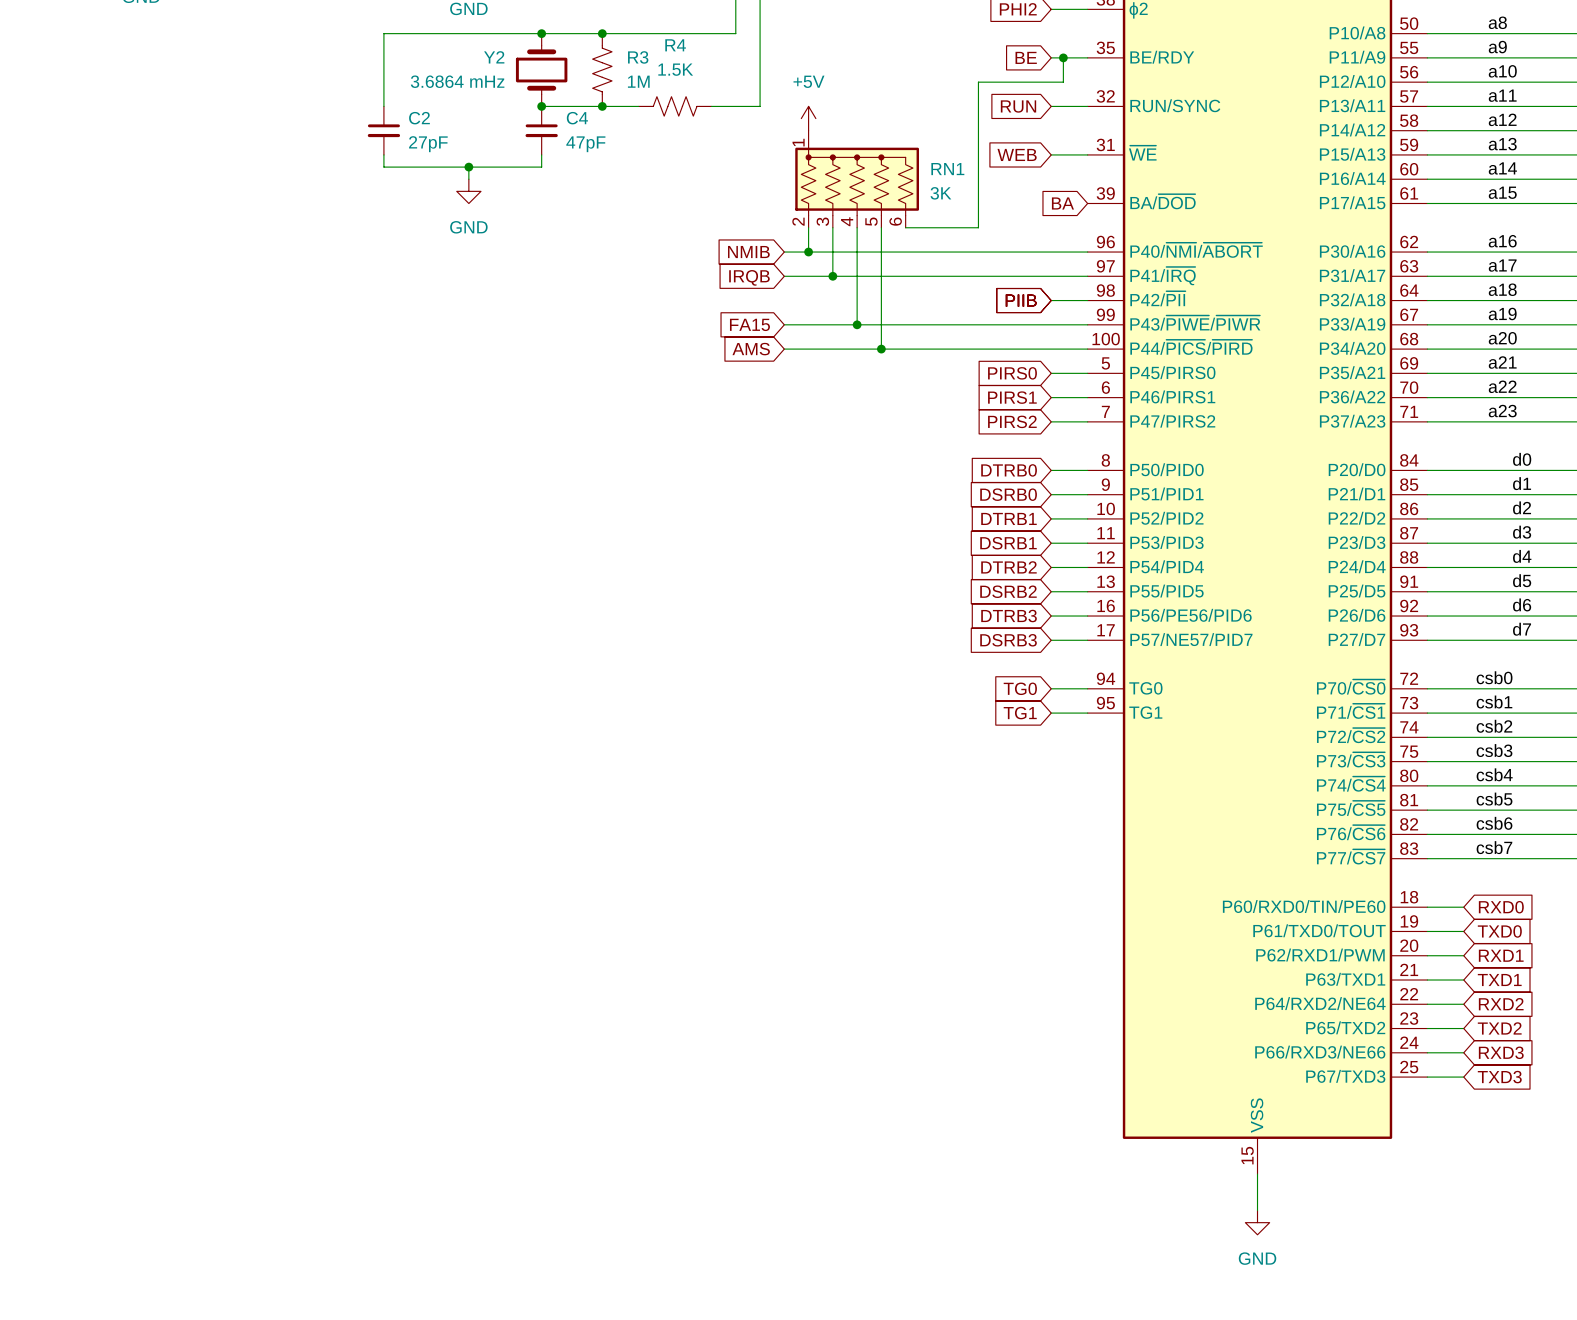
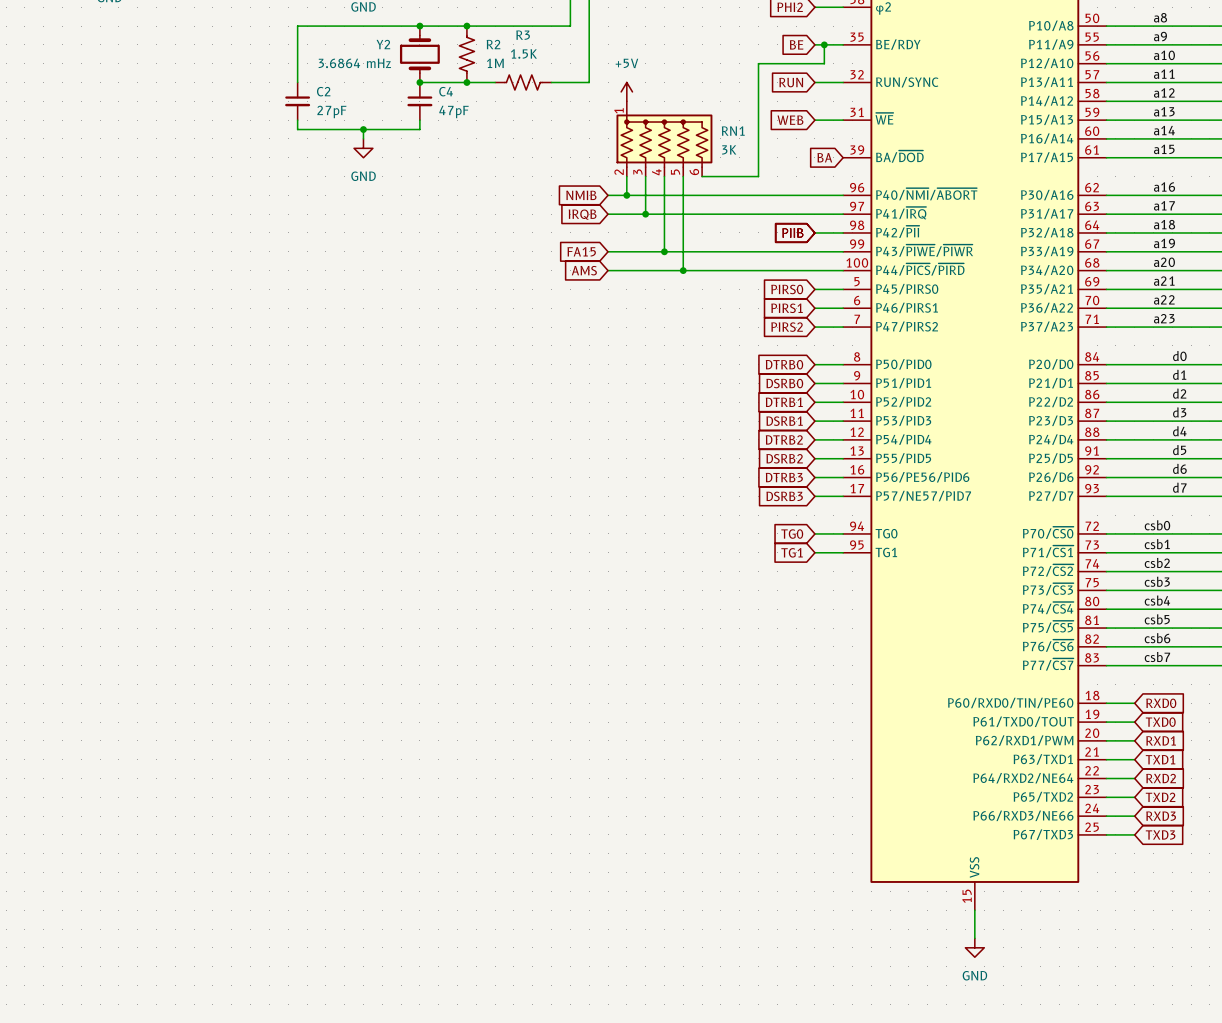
R4 name: R4 (675, 45) -> R3 (523, 35)
R3 name: R3 (638, 57) -> R2 (493, 44)

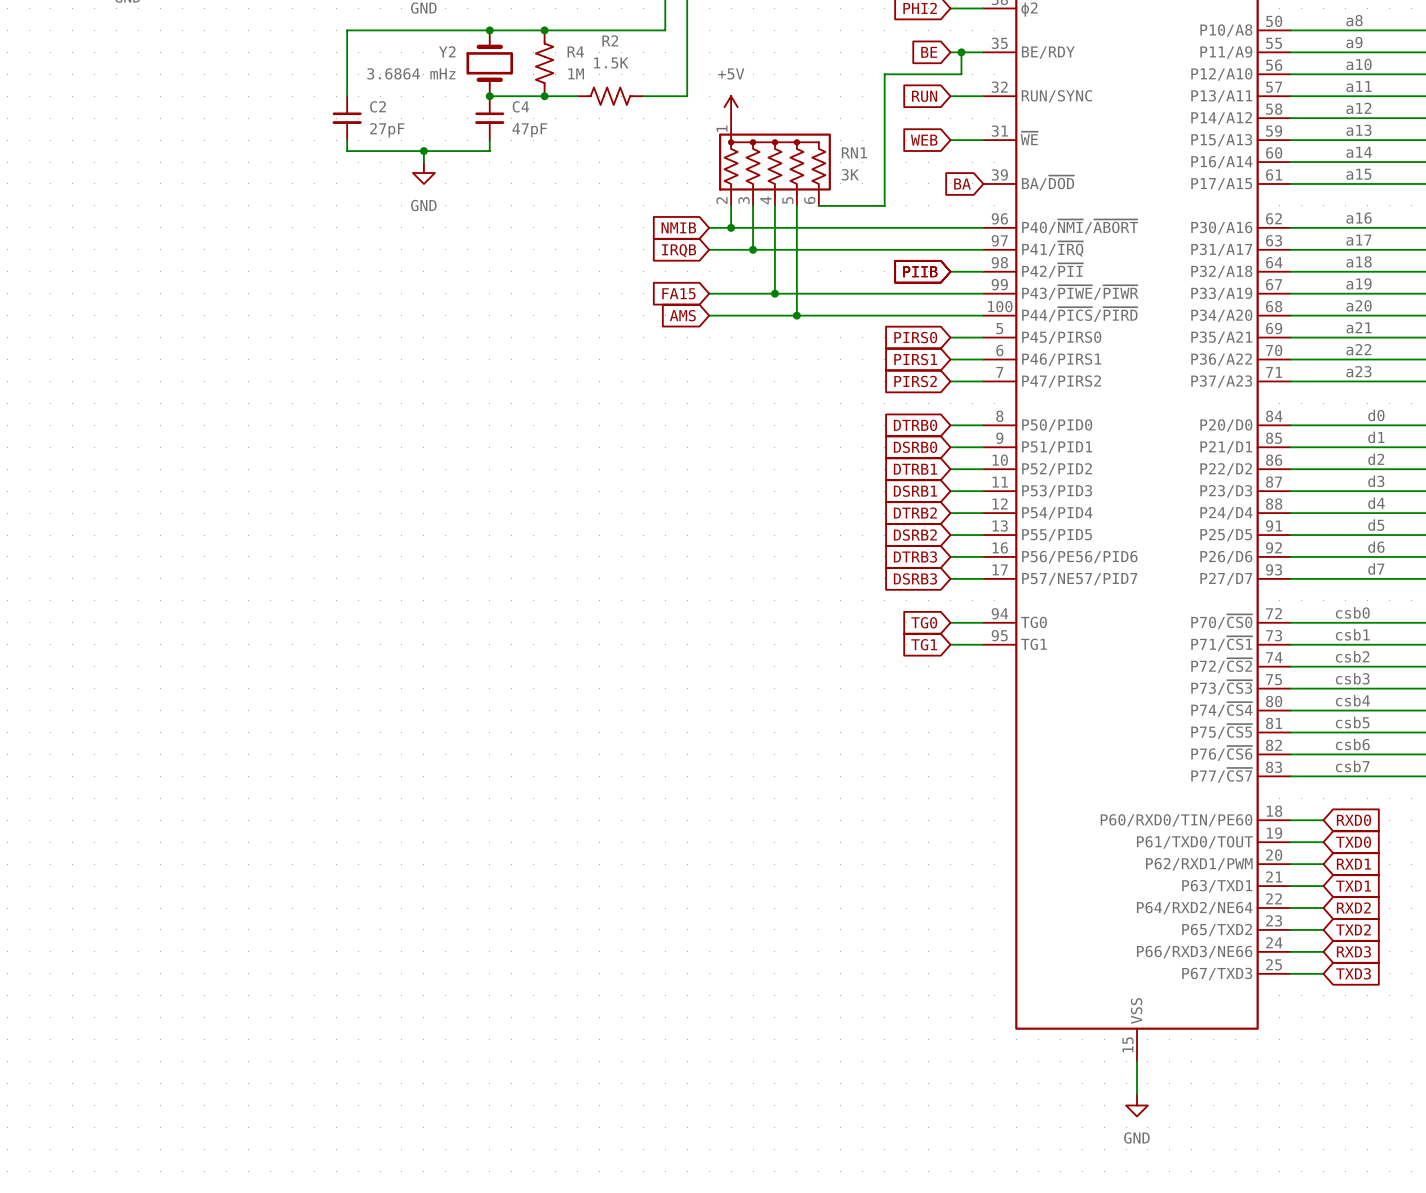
R3 name: R3 (523, 35) -> R2 (610, 40)
R2 name: R2 (493, 44) -> R4 (575, 51)

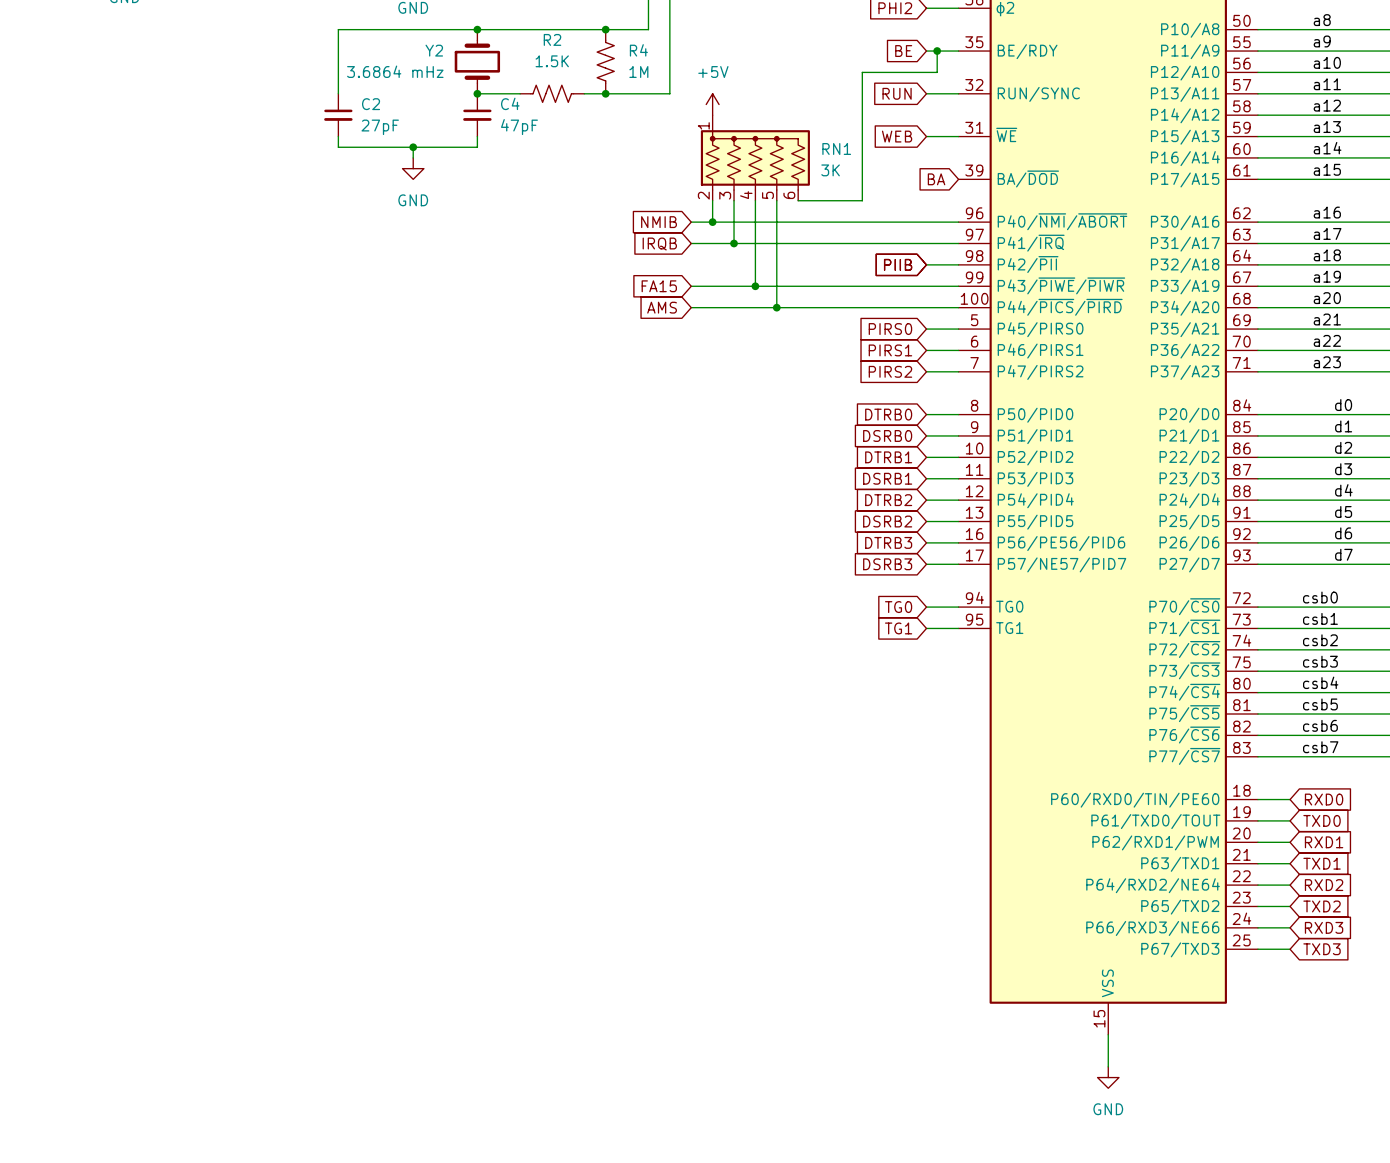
junction: (544, 30) -> none
junction: none -> (605, 29)
R4 position: (544, 63) -> (605, 61)
wire: (533, 96) (577, 96) -> (584, 93) (627, 93)
junction: (544, 96) -> none
R2 position: (610, 96) -> (552, 93)
junction: none -> (605, 93)

